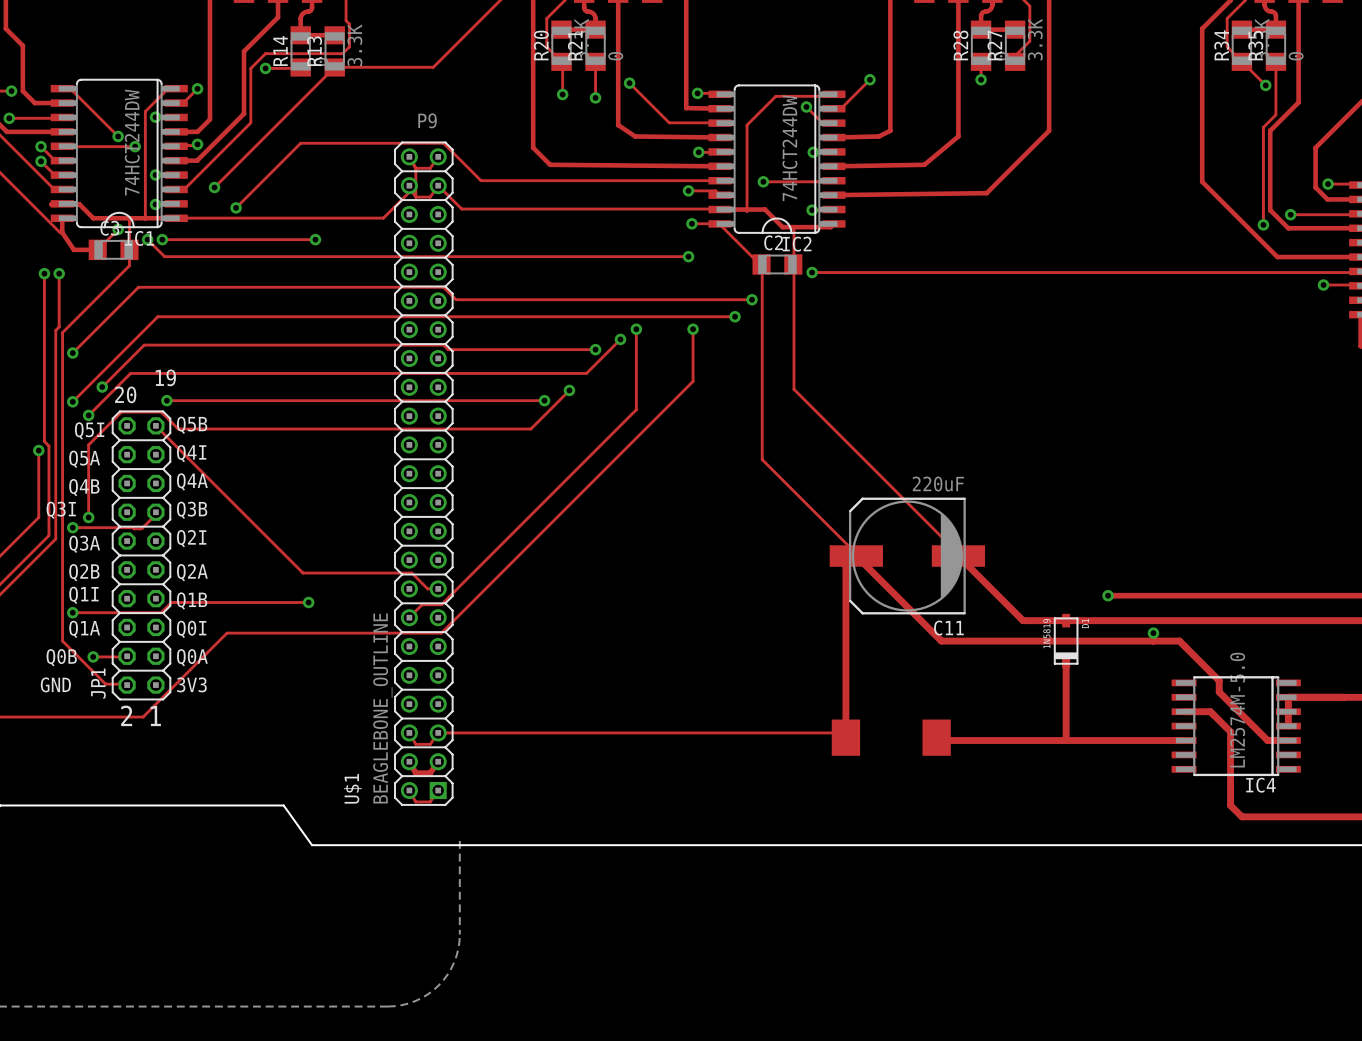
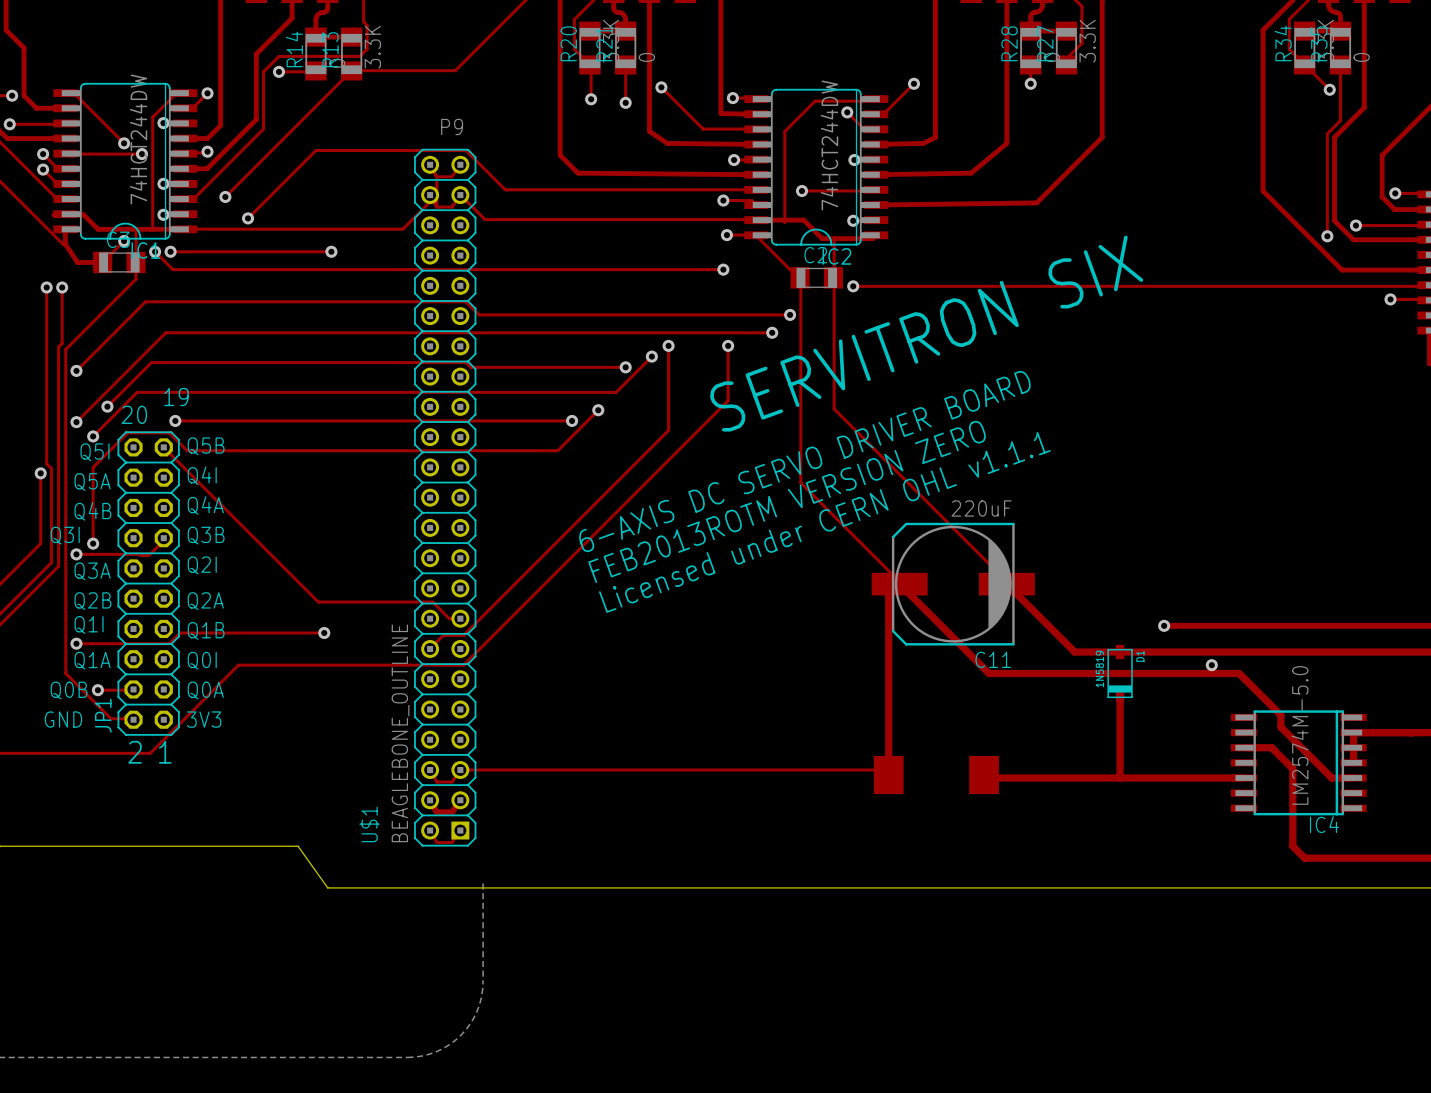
text: none -> SERVITRON SIX (926, 333)
text: none -> 6-AXIS DC SERVO DRIVER BOARD (804, 461)
text: none -> FEB2013ROTM VERSION ZERO (787, 501)
text: none -> Licensed under CERN OHL v1.1.1 (824, 522)

